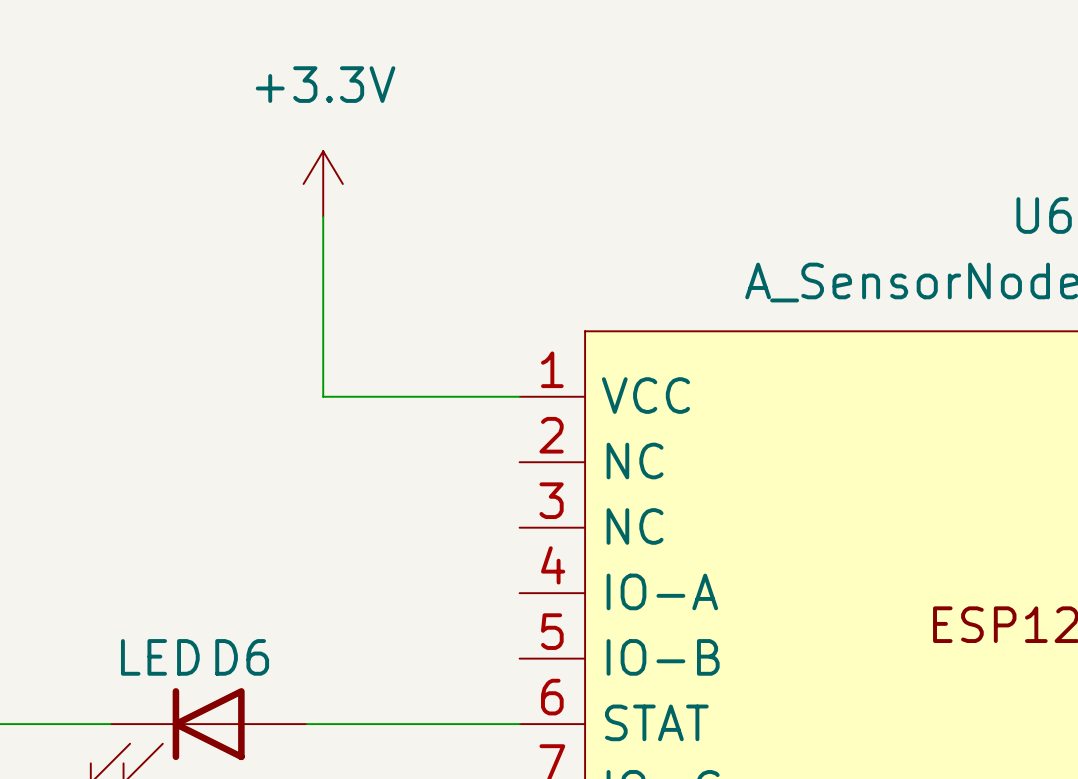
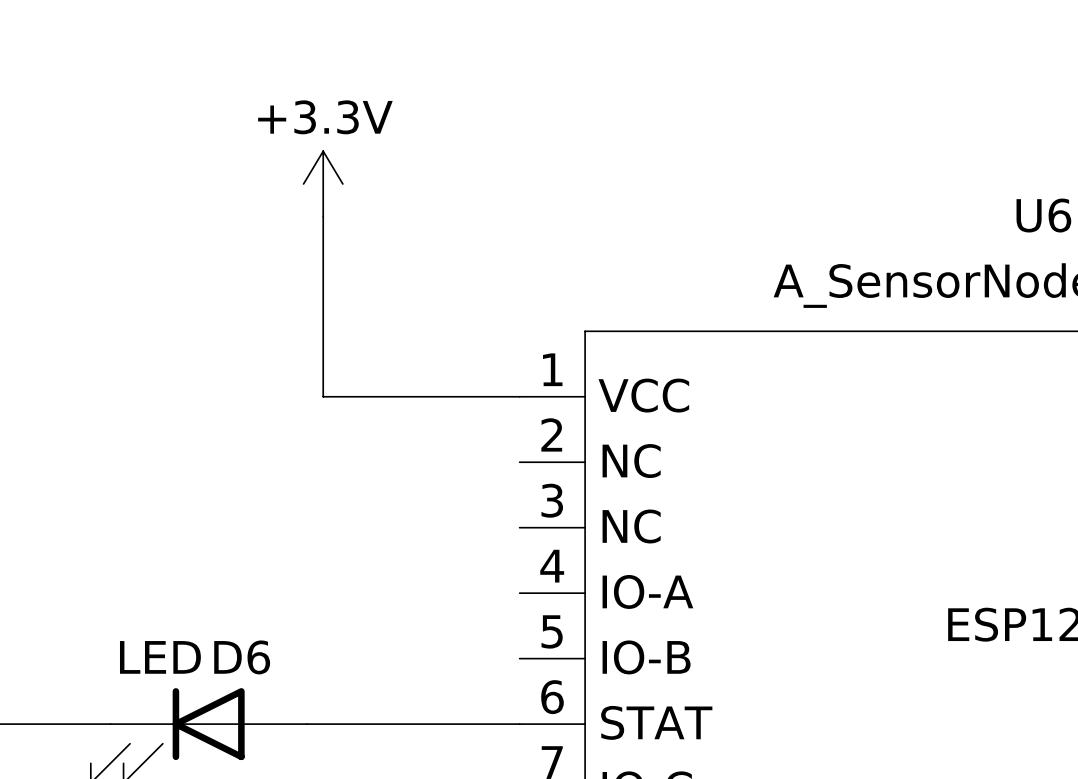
power symbol text position: +3.3V (325, 84) -> +3.3V (325, 117)

